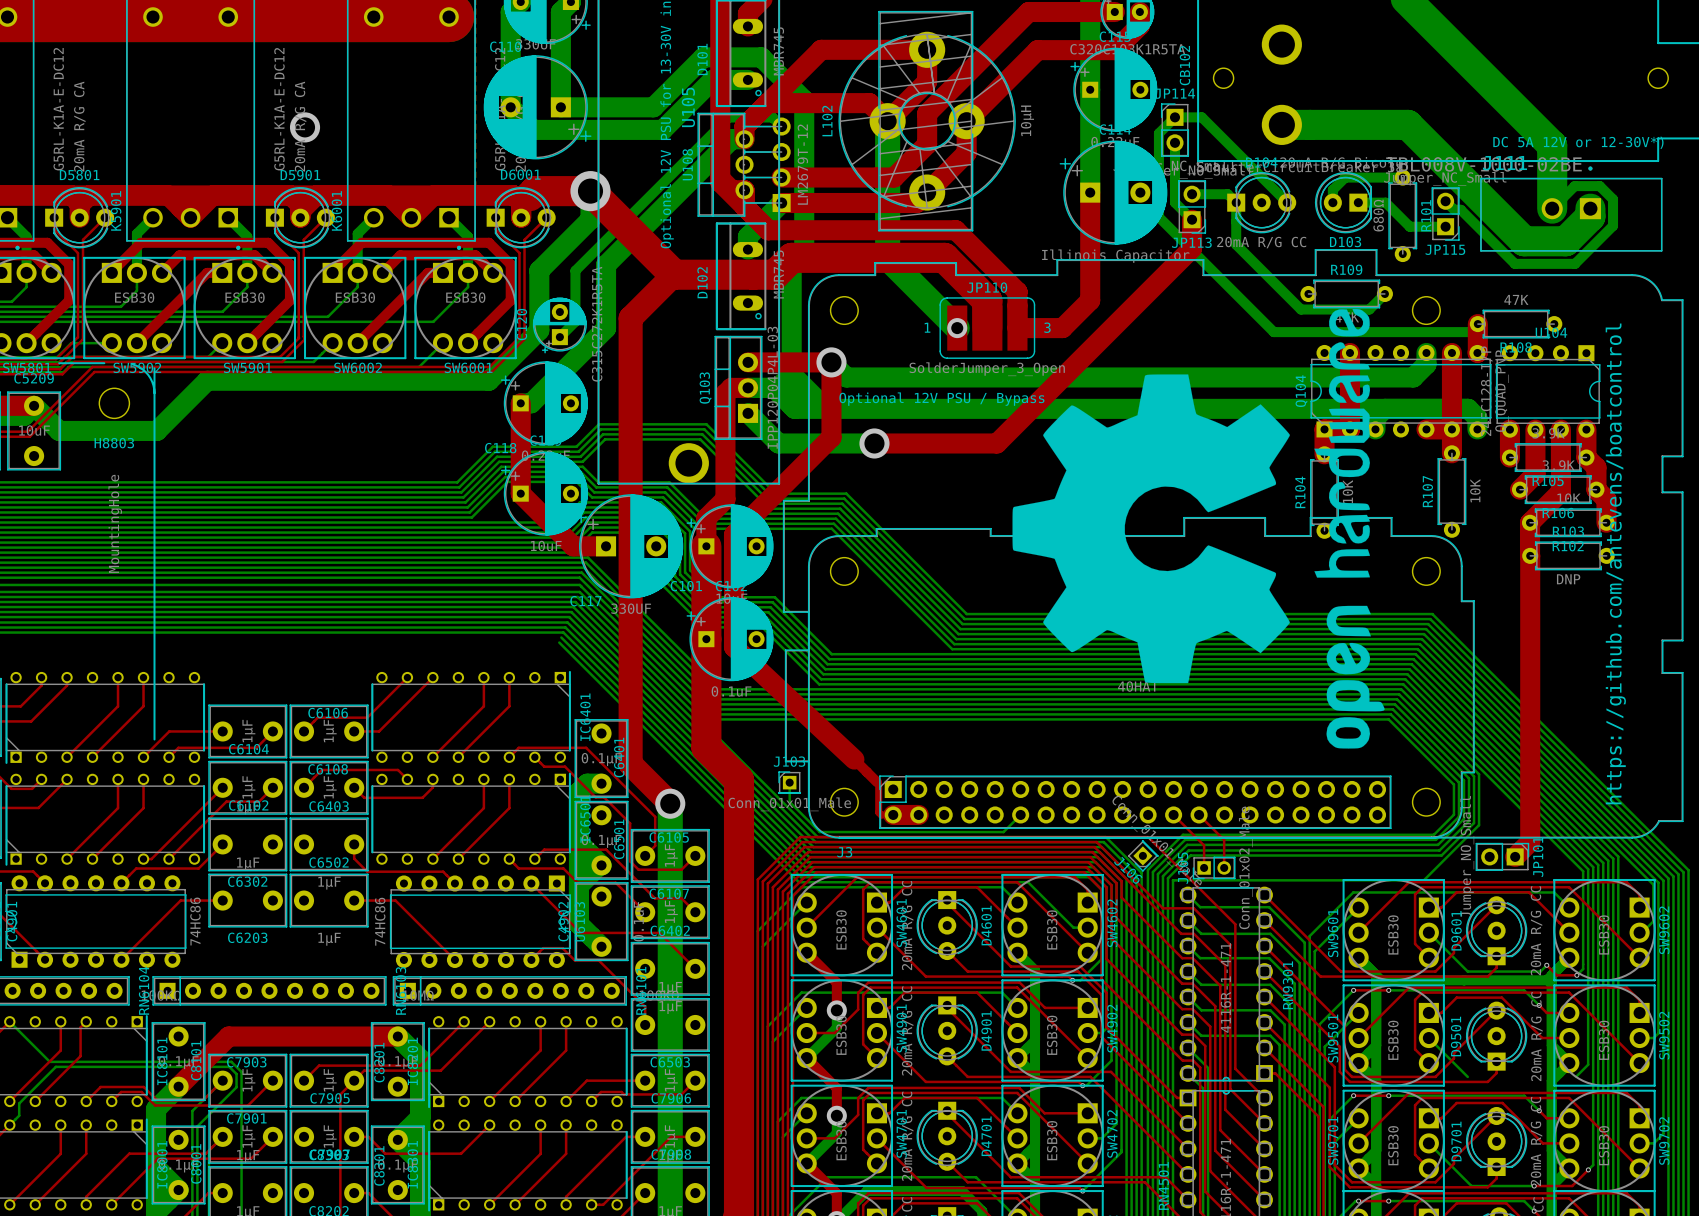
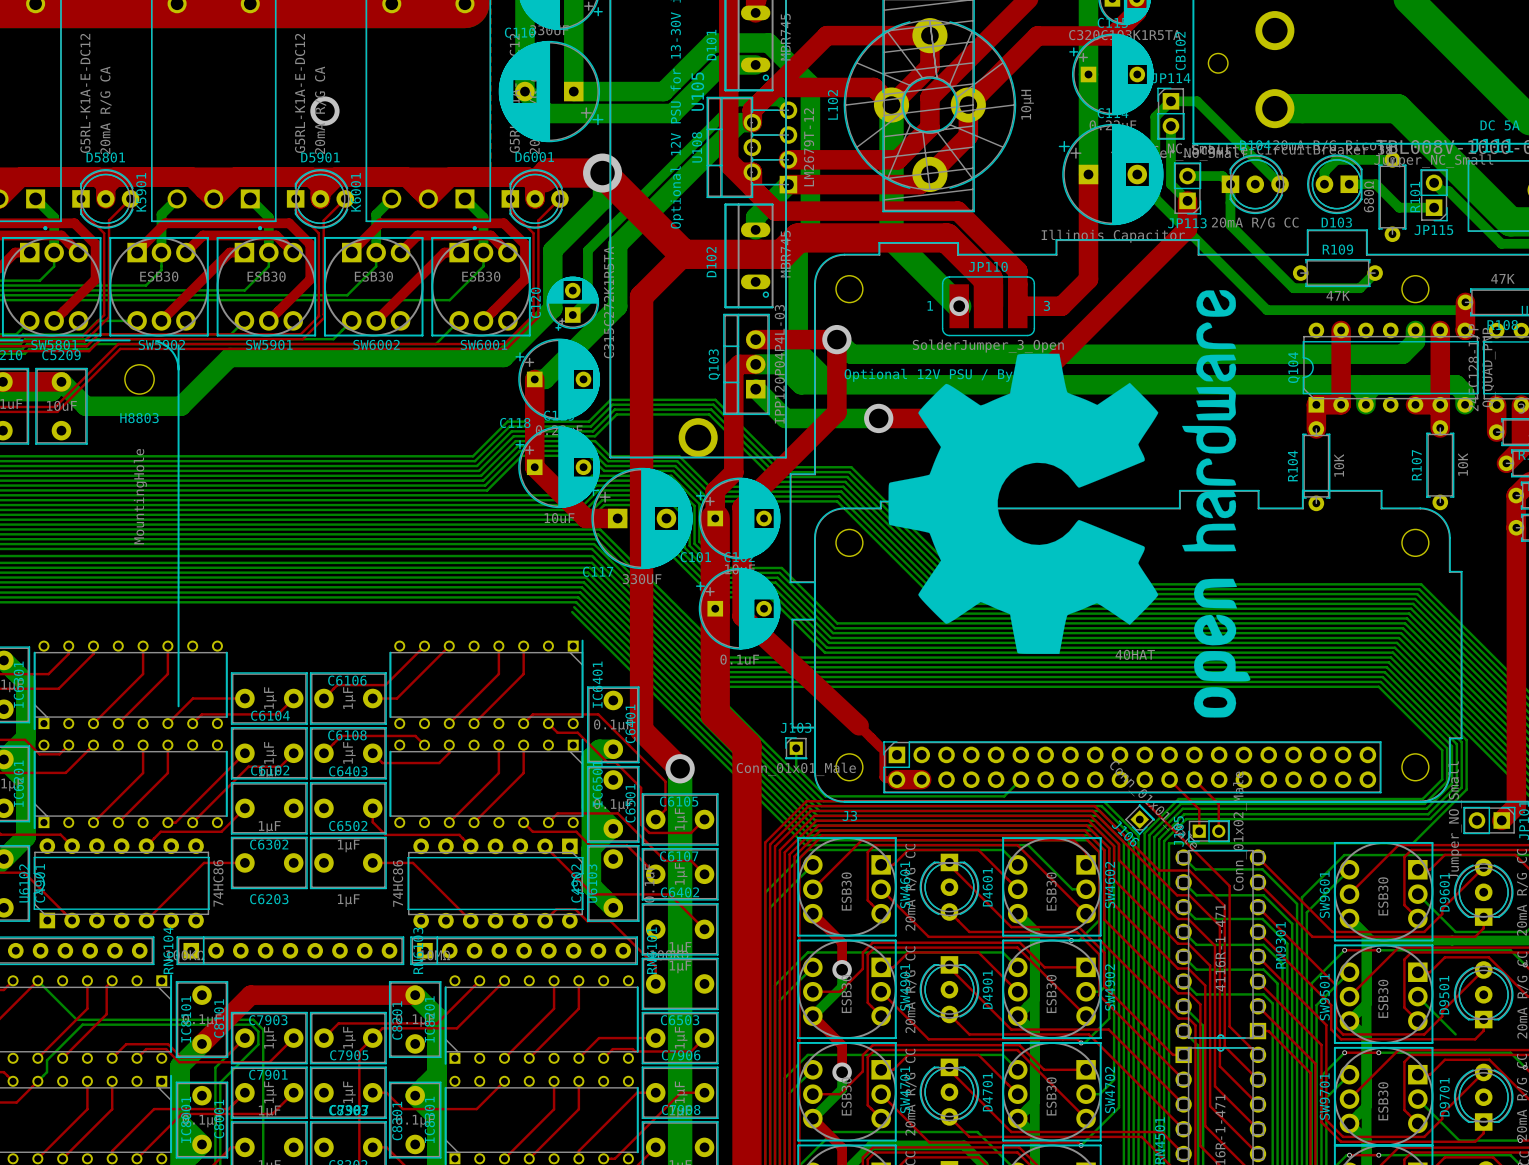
drawing position: (1198, 528) -> (1069, 503)

